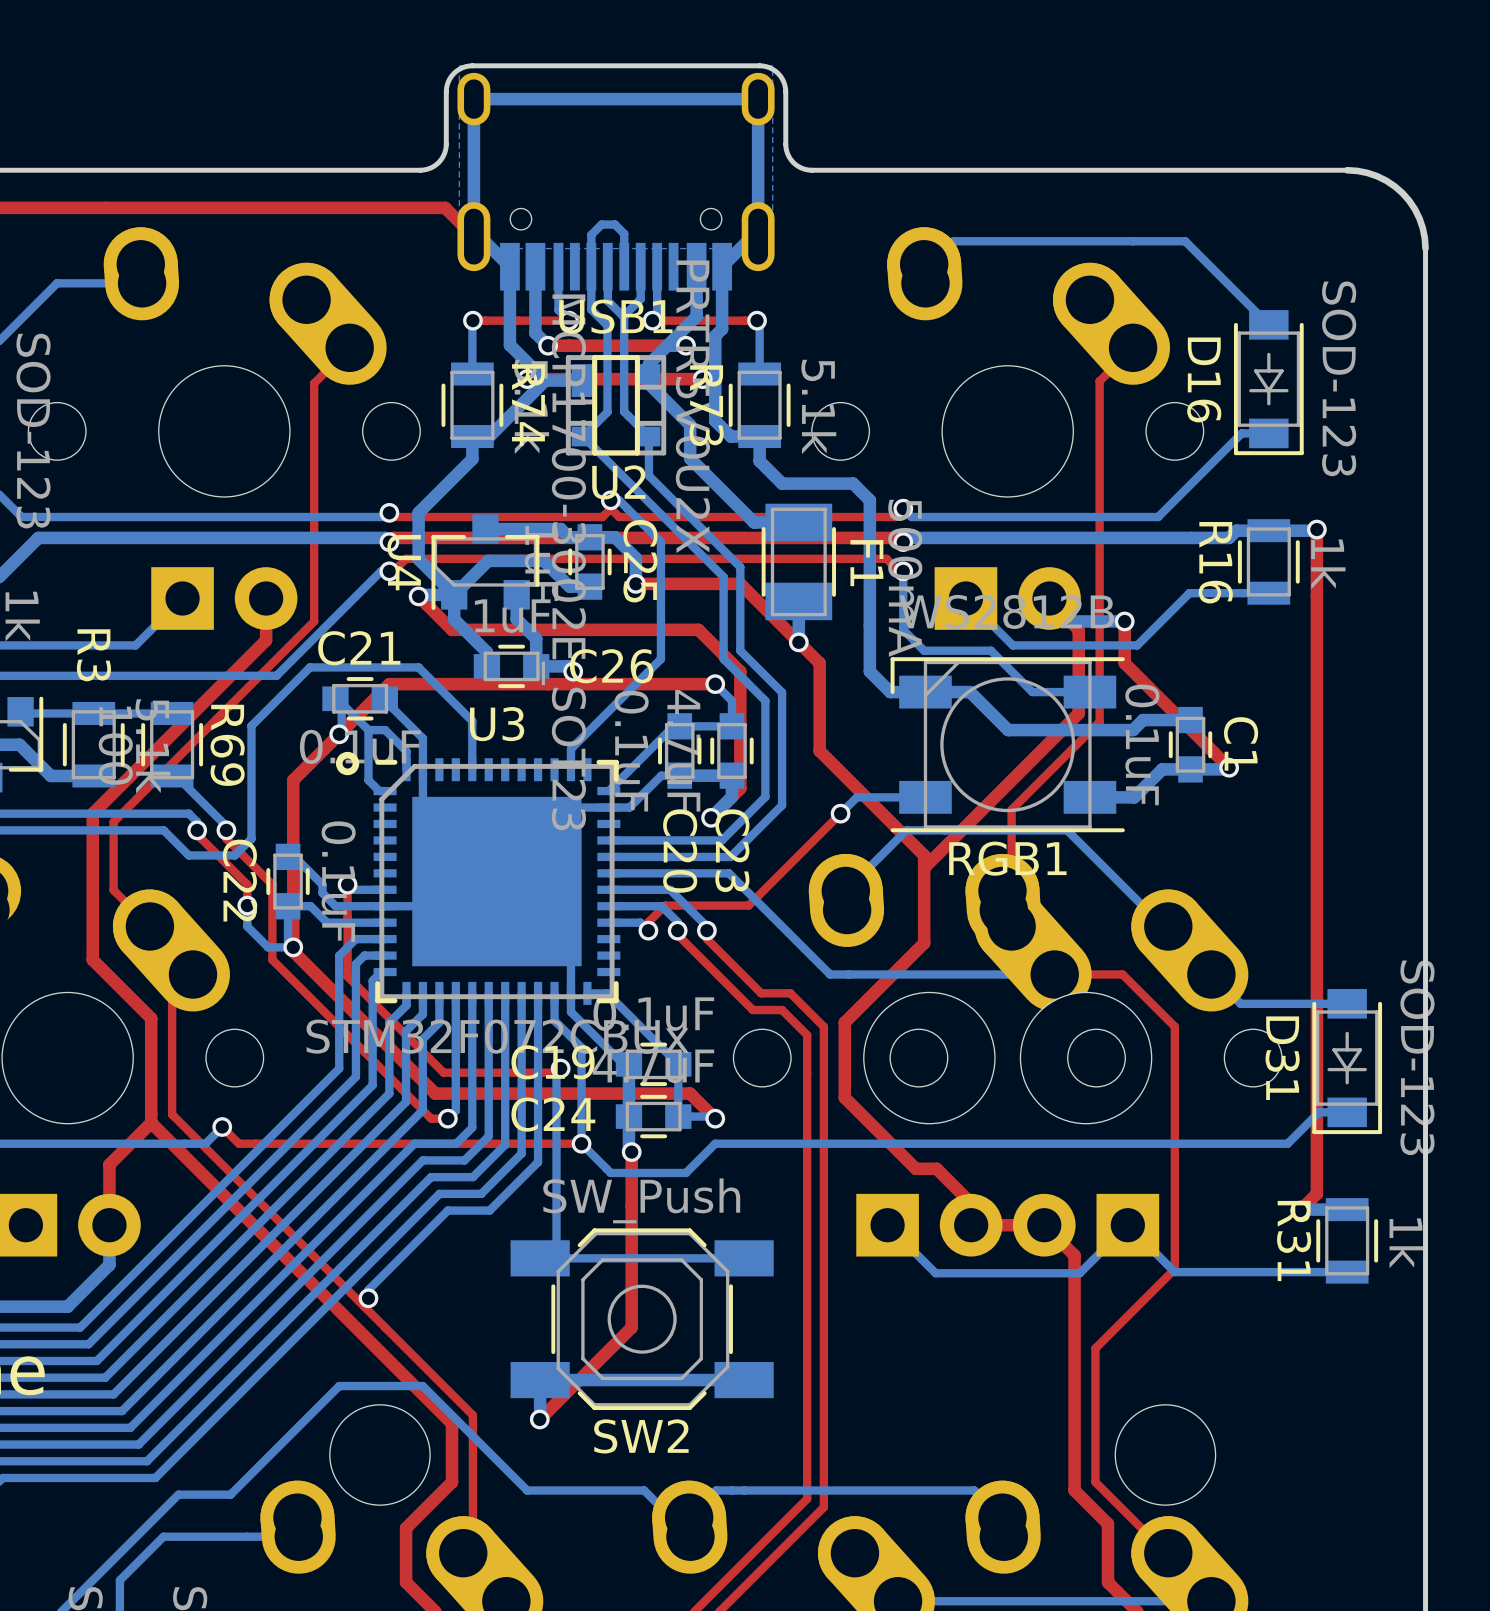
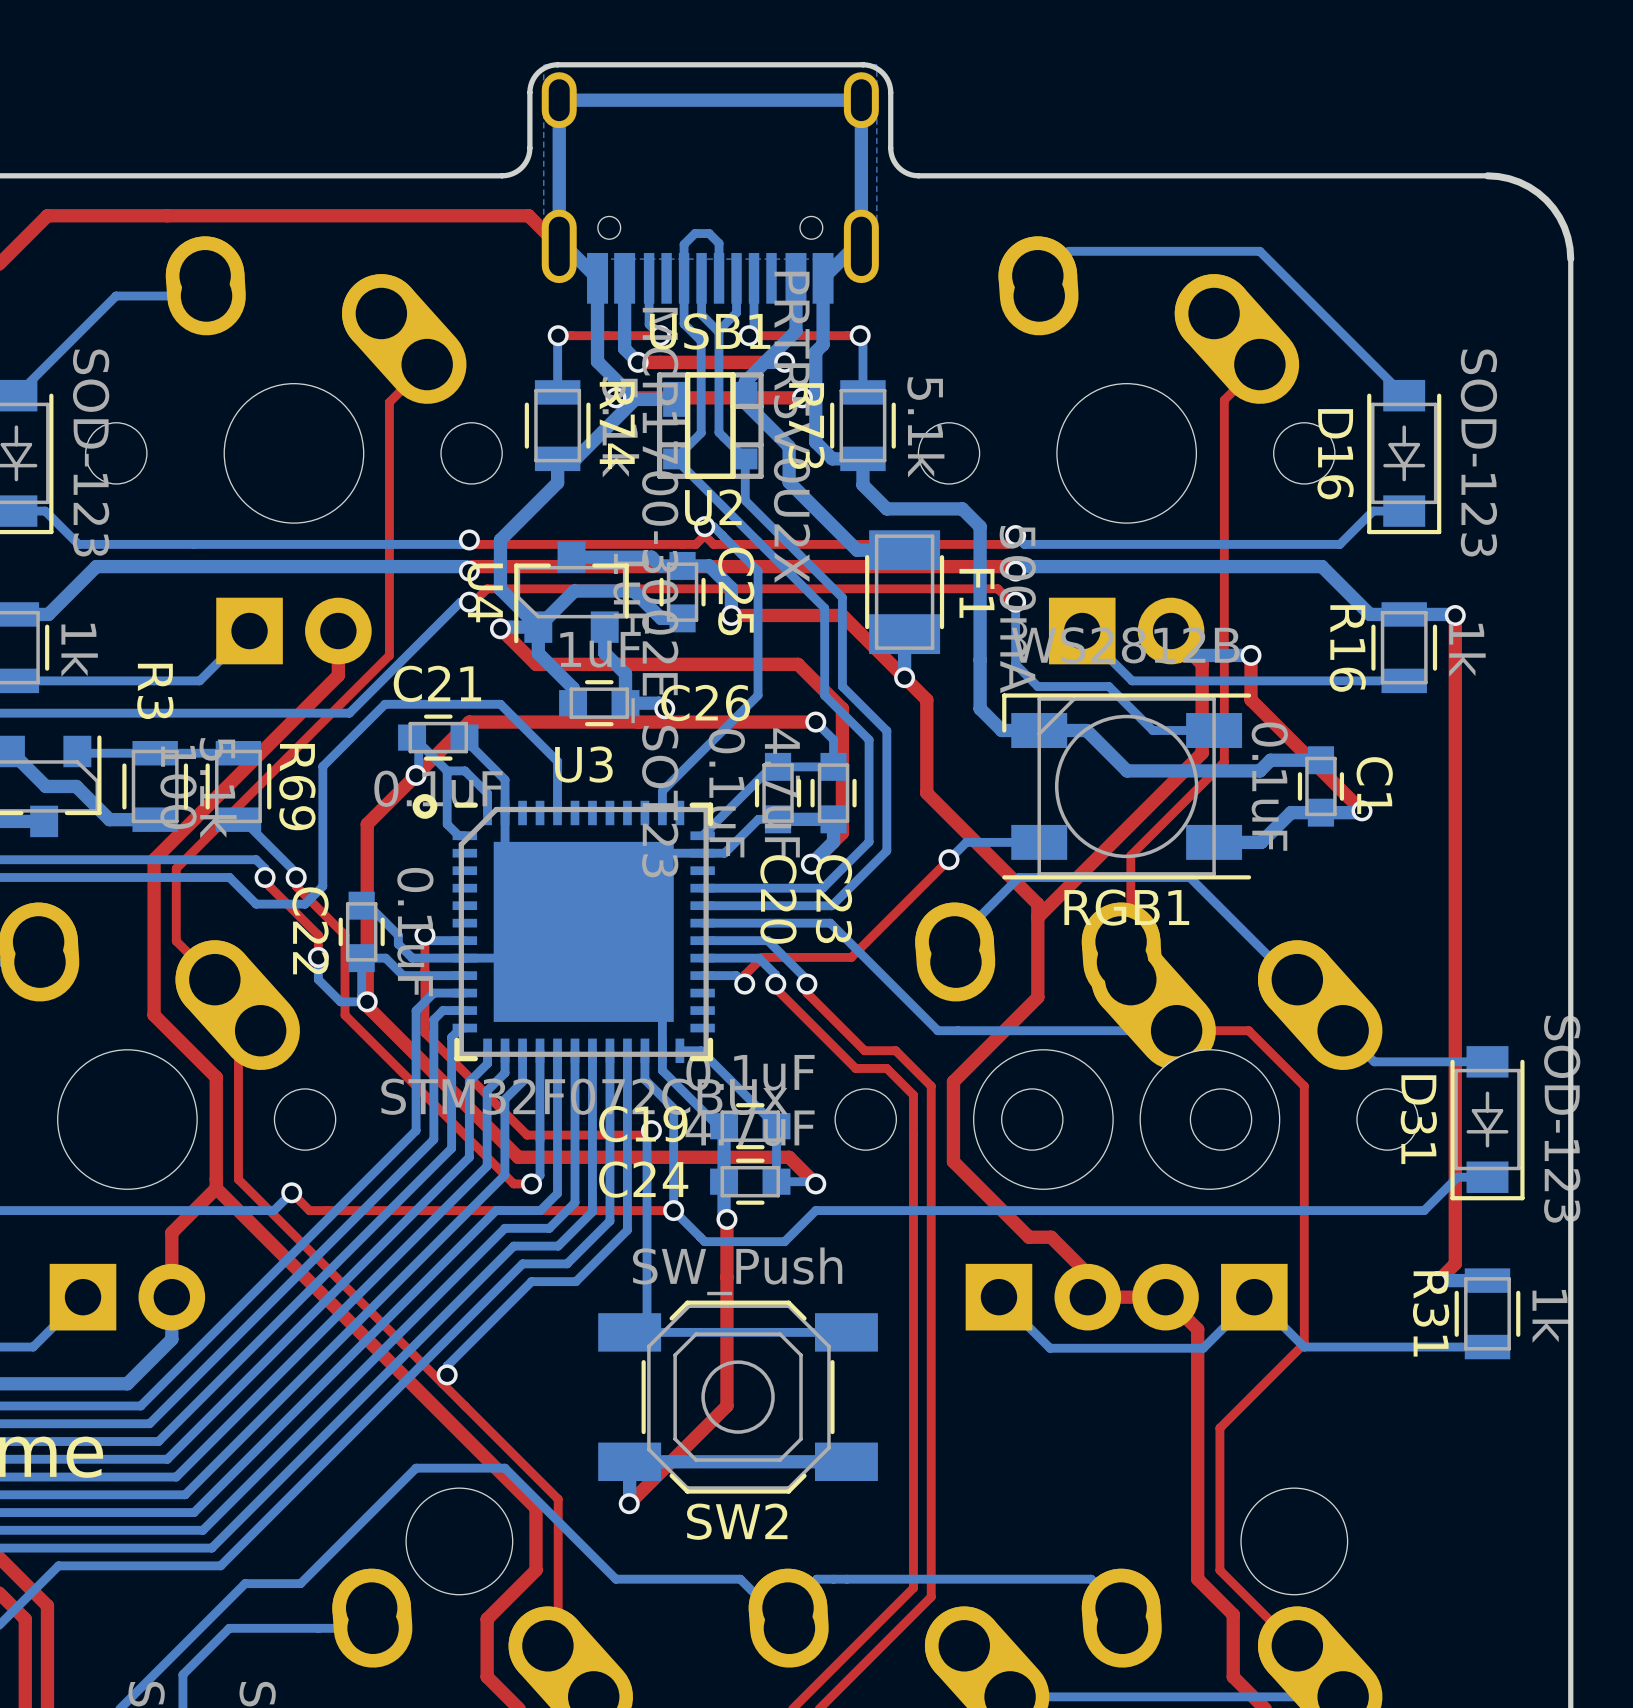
bottom track: (1133, 241) (1185, 241) (1268, 324) -> (1259, 251) (1404, 395)
D16 position: (1268, 382) -> (1404, 457)
bottom track: (1268, 433) (1241, 433) (1158, 517) -> (1404, 511) (1373, 511) (1339, 544) (1286, 544)
top track: (1316, 529) (1316, 583) -> none
bottom track: (1316, 529) (1236, 530) (1229, 537) (1191, 537) -> (1455, 615) (1369, 614) (1322, 566)
via position: (1316, 529) -> (1455, 615)
R16 position: (1268, 561) -> (1404, 647)
bottom track: (1268, 593) (1189, 593) (1137, 645) -> (1404, 680) (1264, 680)

